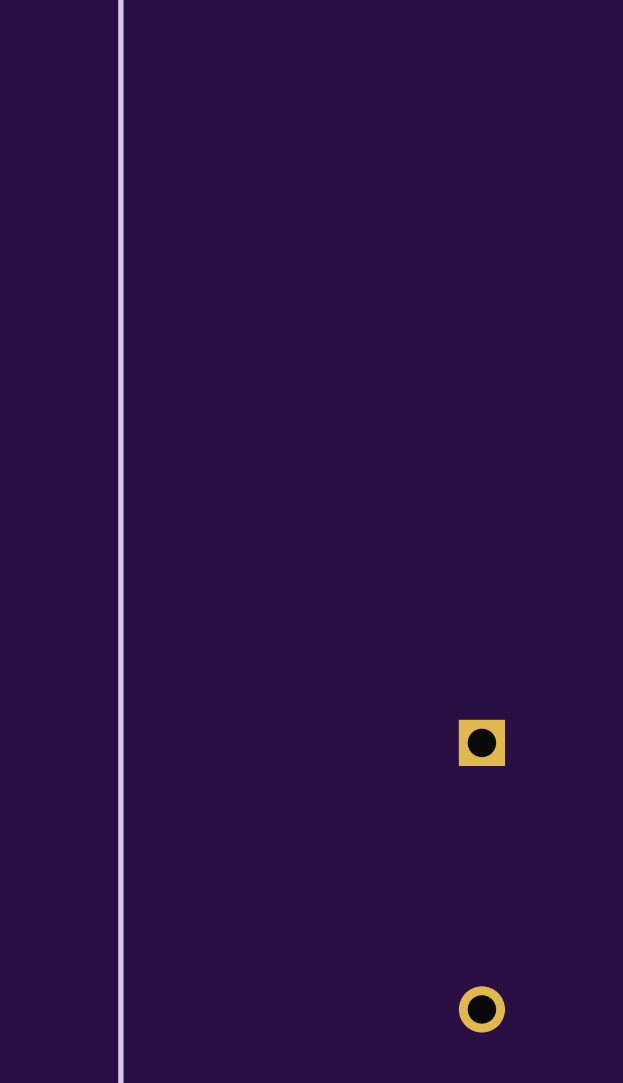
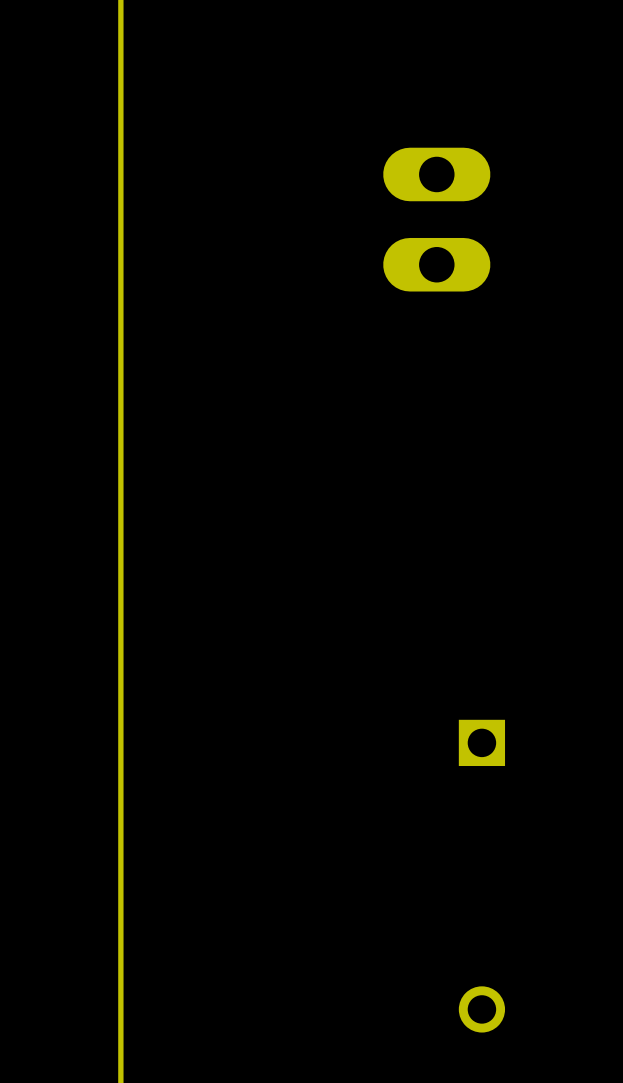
part: none -> (436, 219)

